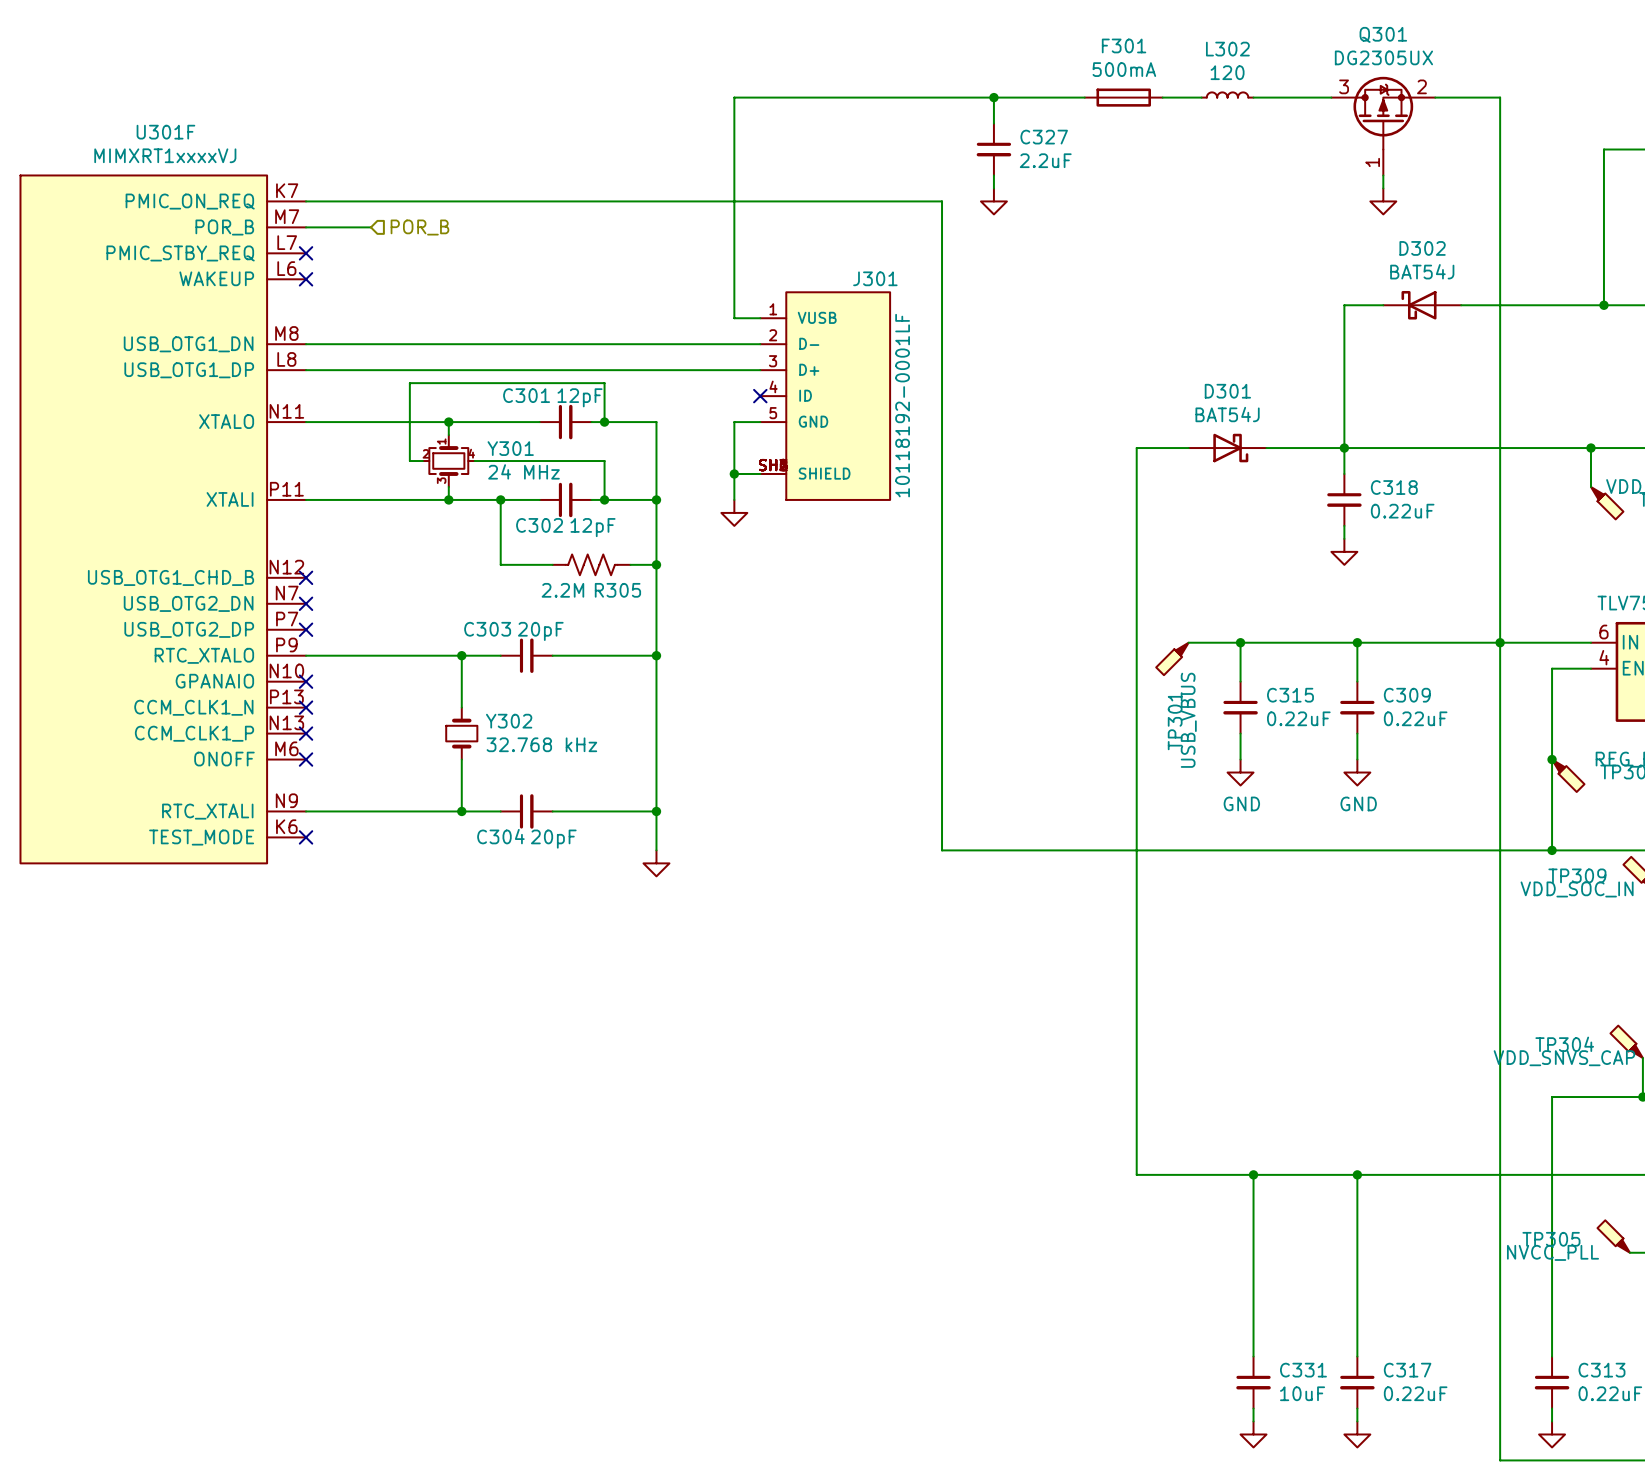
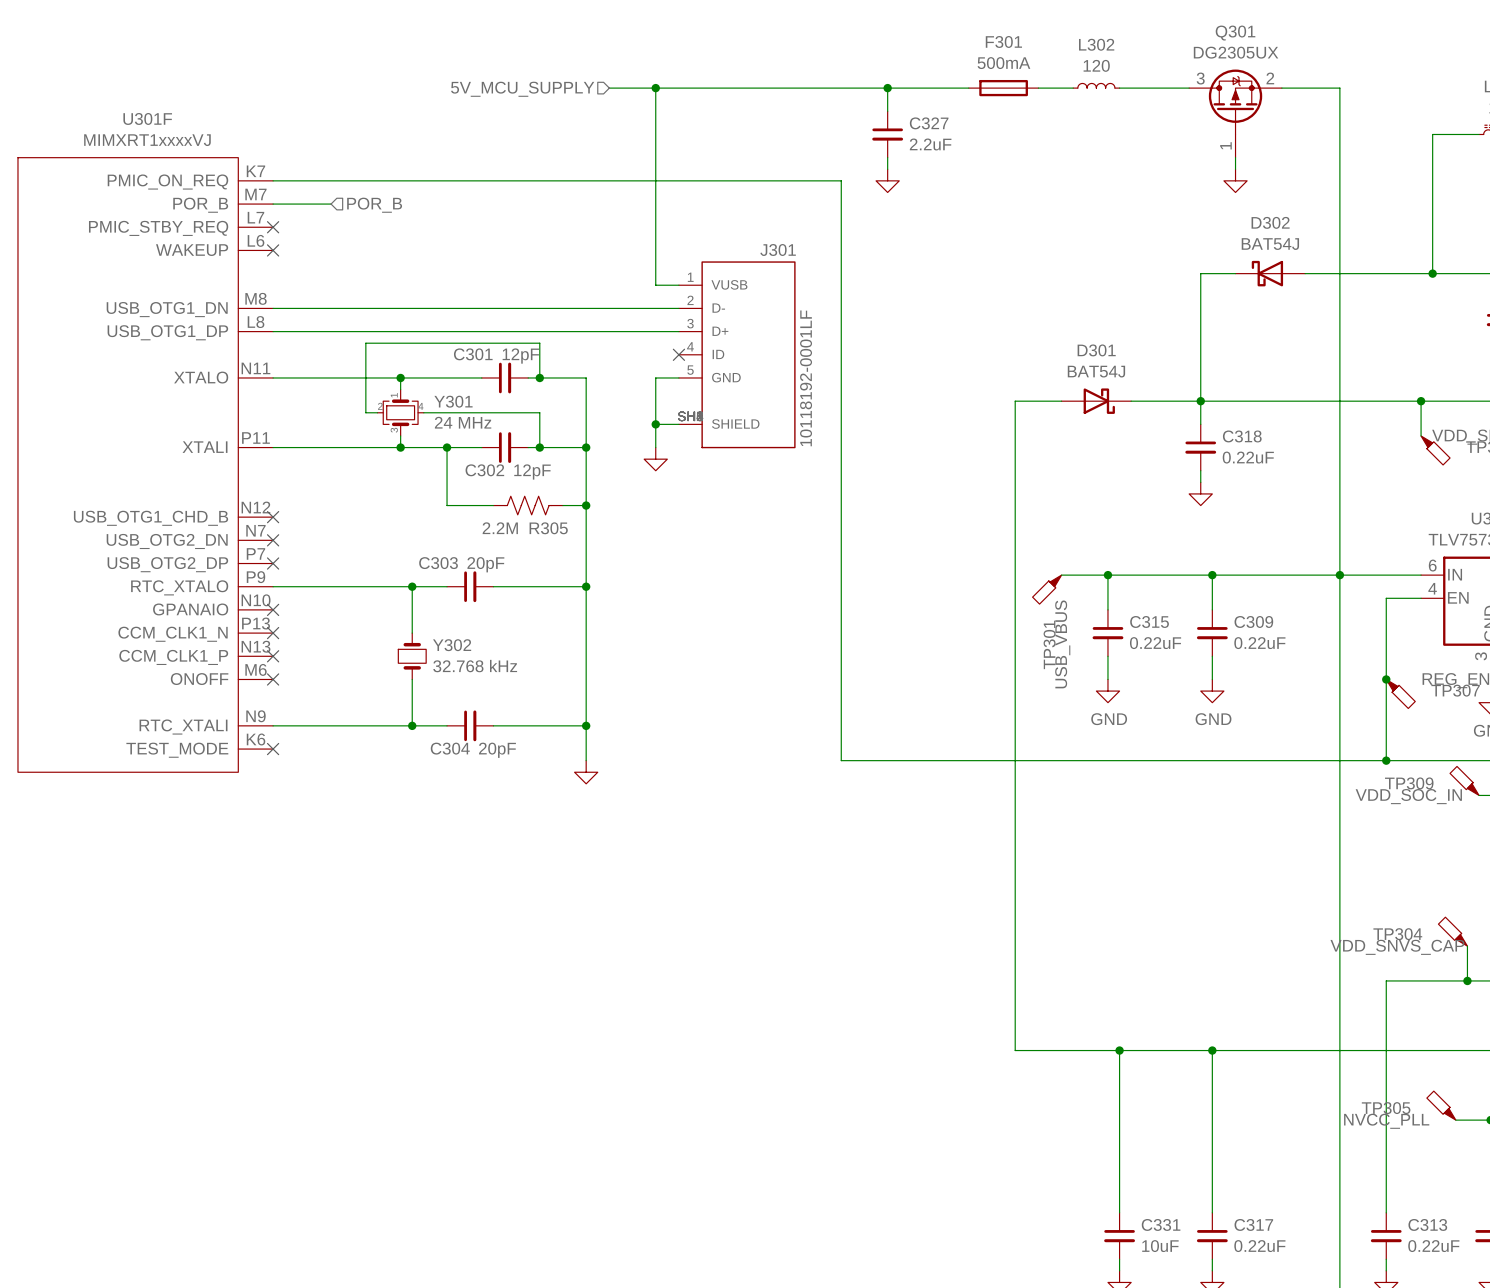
hierarchical label: none -> 5V_MCU_SUPPLY (522, 89)
wire: none -> (609, 88) (655, 88)
junction: none -> (655, 88)

